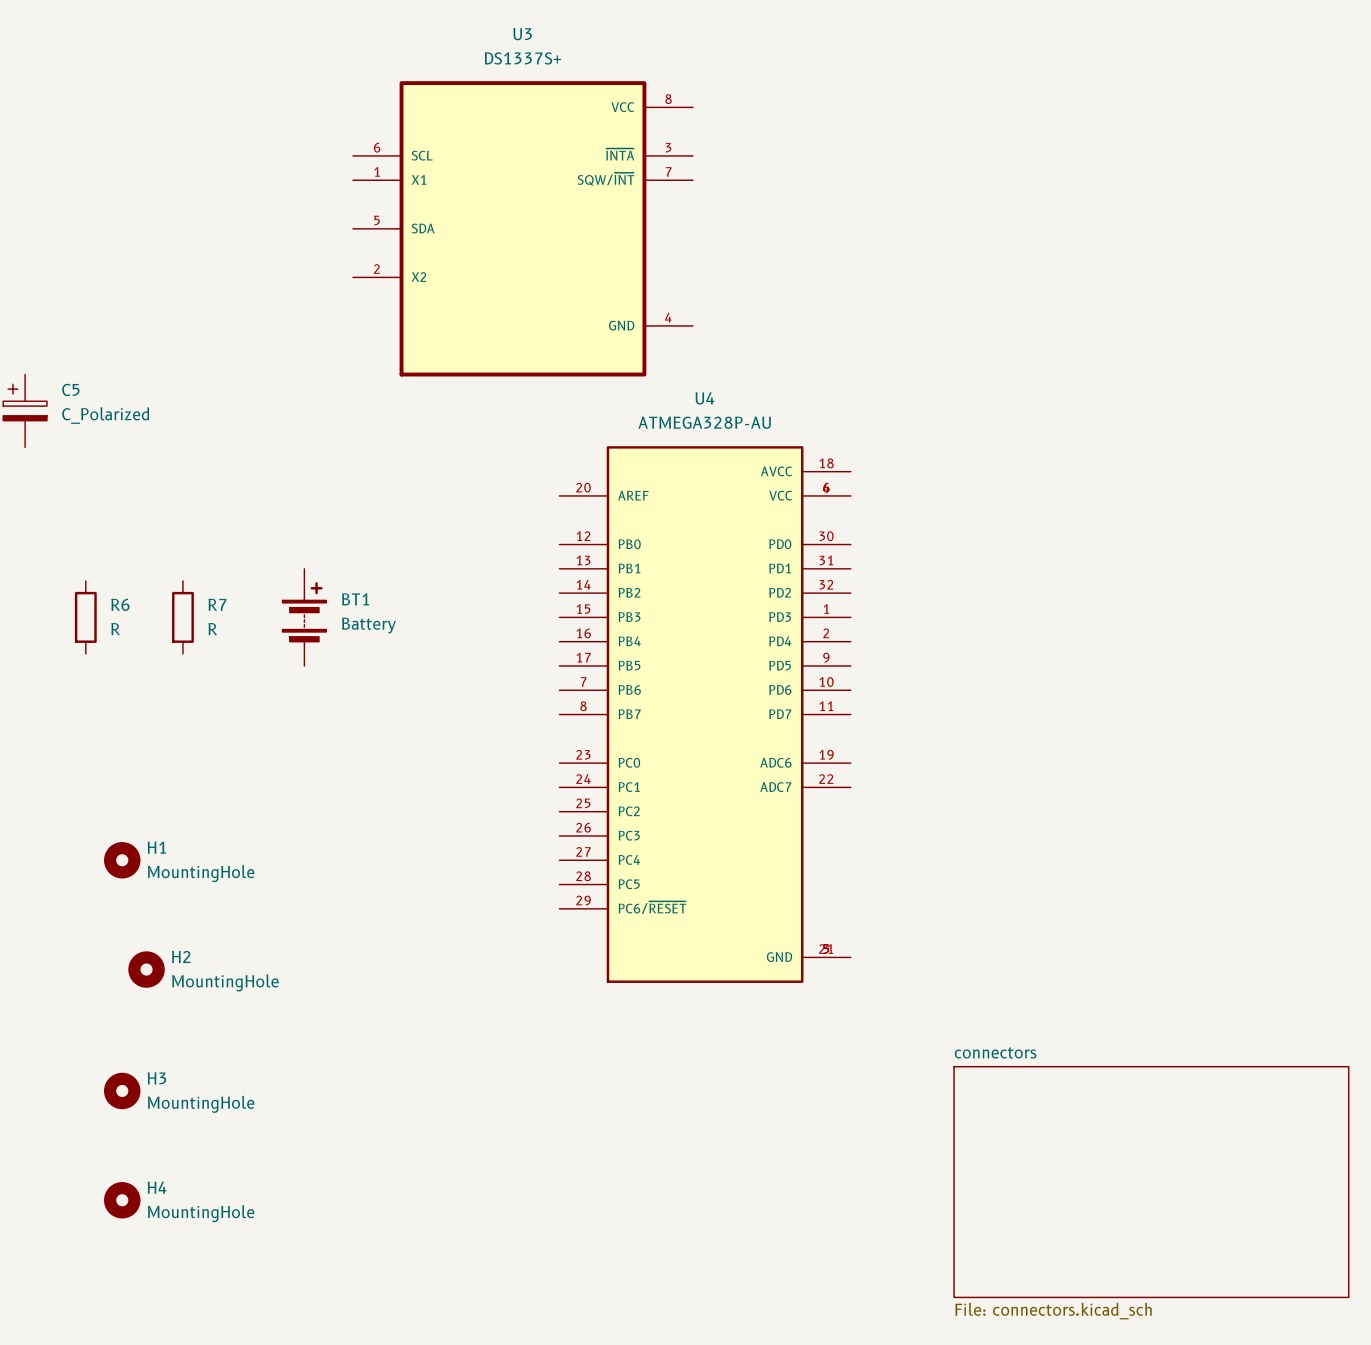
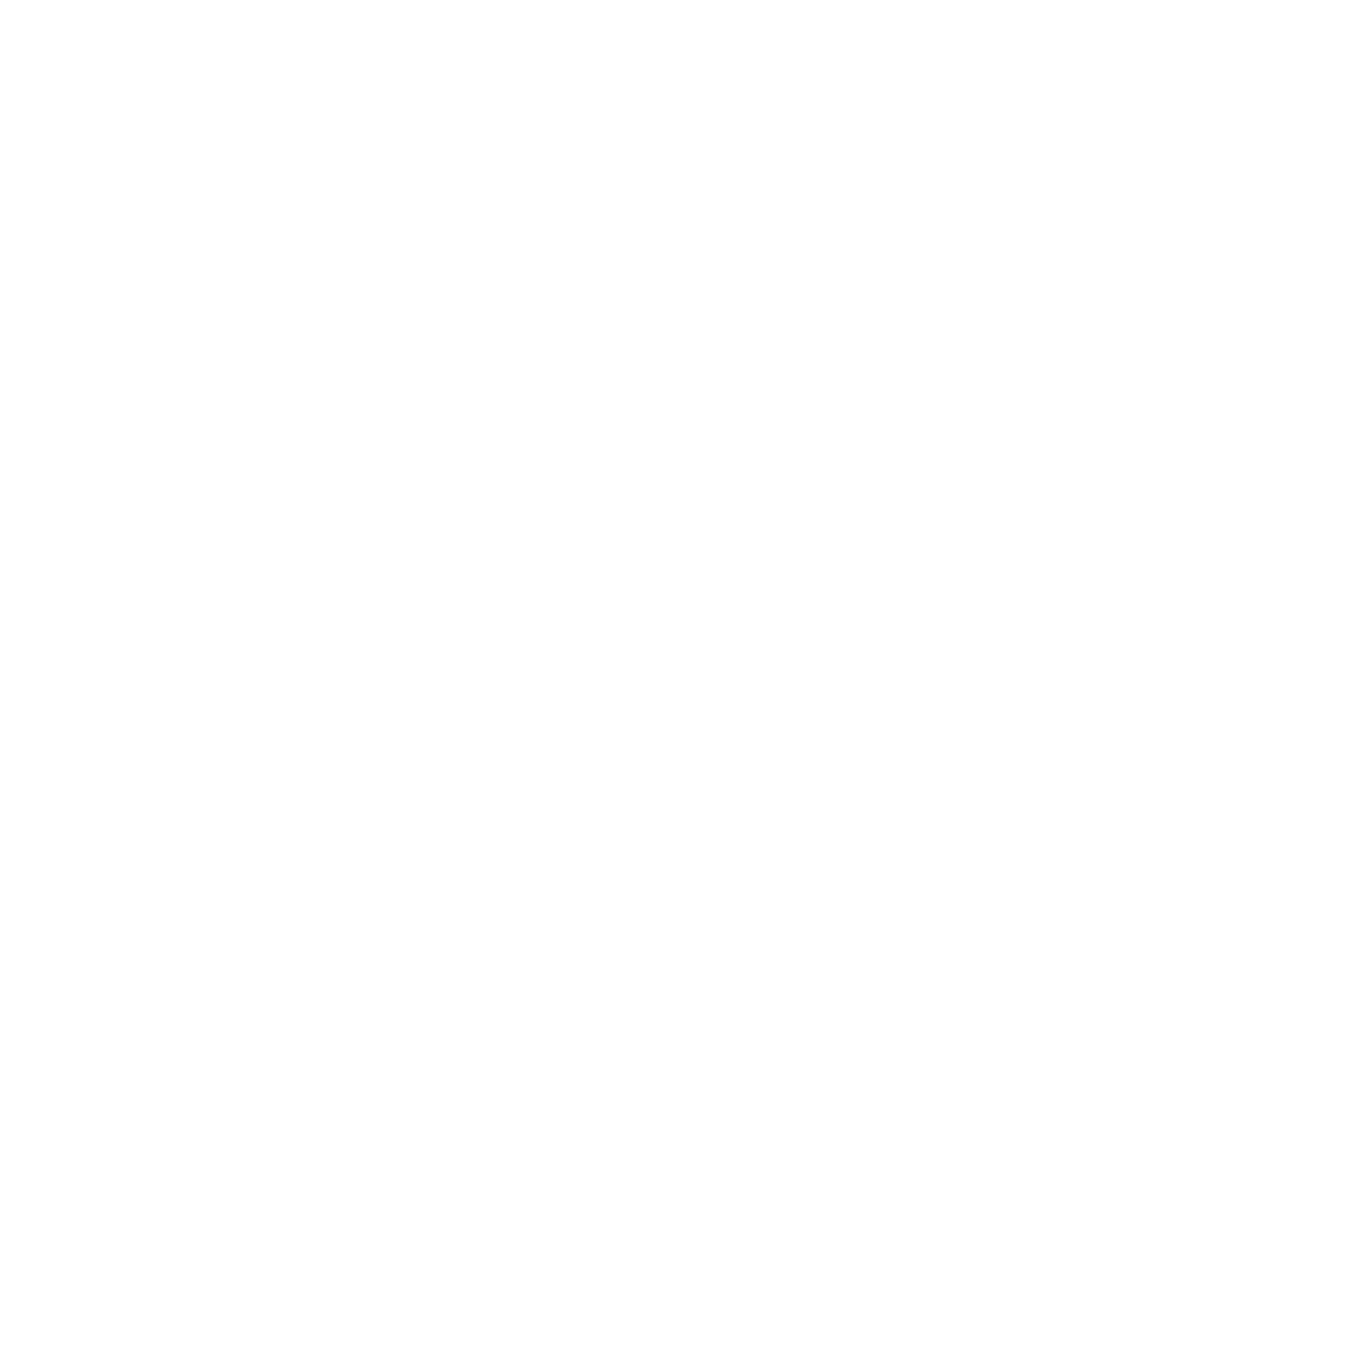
U3: DS1337S+ (522, 228) -> none
C5: C_Polarized (25, 410) -> none
R6: R (85, 617) -> none
R7: R (182, 617) -> none
BT1: Battery (304, 617) -> none
U4: ATMEGA328P-AU (705, 714) -> none
H1: MountingHole (122, 860) -> none
H2: MountingHole (146, 969) -> none
H3: MountingHole (122, 1090) -> none
sheet connectors: File: connectors.kicad_sch (1151, 1182) -> none
H4: MountingHole (122, 1200) -> none

